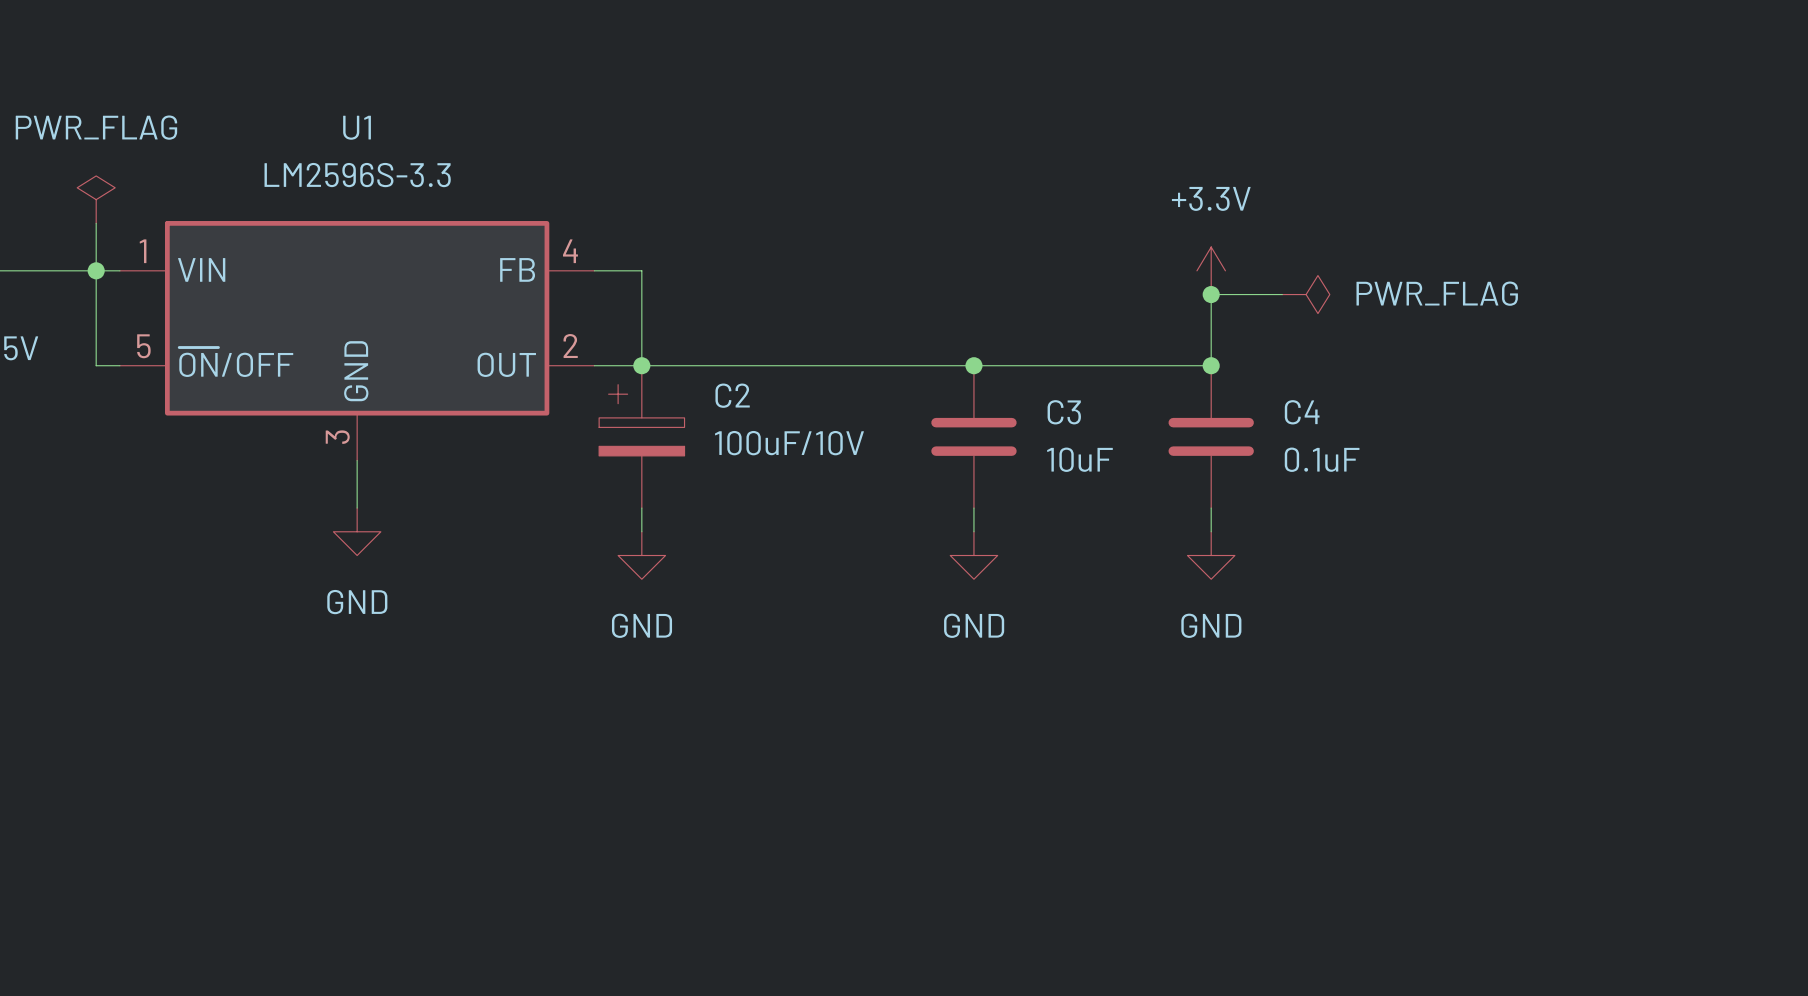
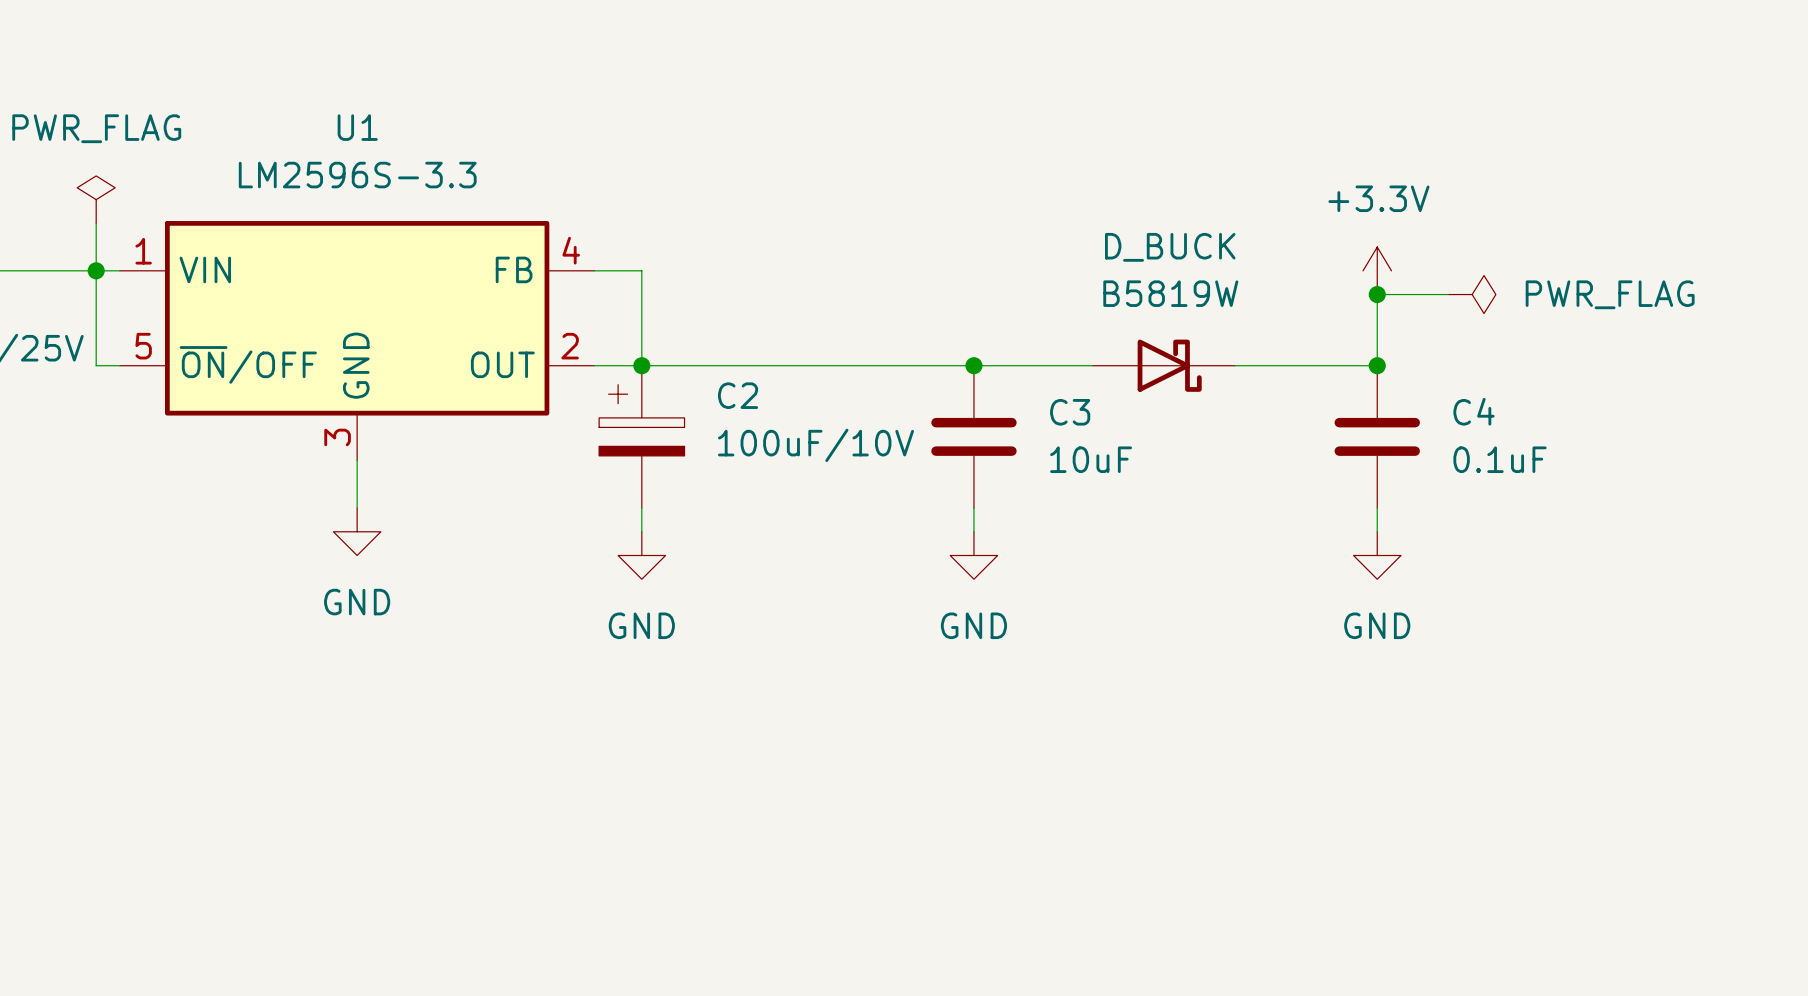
power symbol position: +3.3V (1211, 270) -> +3.3V (1377, 270)
junction: (1211, 294) -> none
wire: (1282, 294) (1211, 294) (1211, 365) (1092, 365) -> none
power symbol position: PWR_FLAG (1306, 294) -> PWR_FLAG (1472, 294)
junction: none -> (1377, 294)
wire: none -> (1448, 294) (1377, 294) (1377, 365) (1234, 365)
D_BUCK: none -> B5819W (1163, 365)
junction: (1211, 365) -> none
junction: none -> (1377, 365)
C4 position: (1211, 436) -> (1377, 436)
wire: (1211, 508) (1211, 531) -> (1377, 508) (1377, 531)
power symbol position: GND (1211, 555) -> GND (1377, 555)

